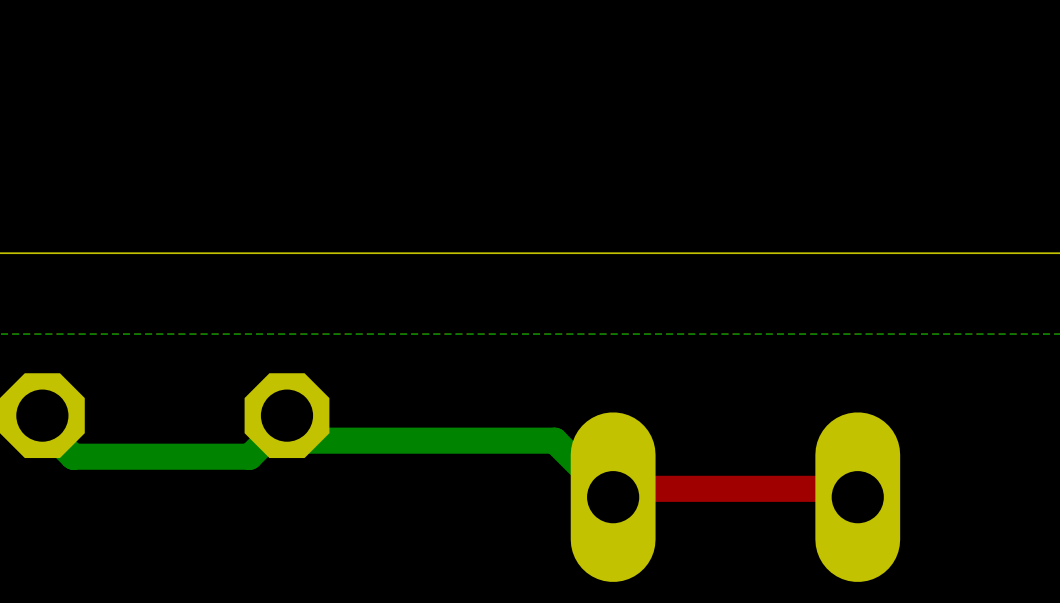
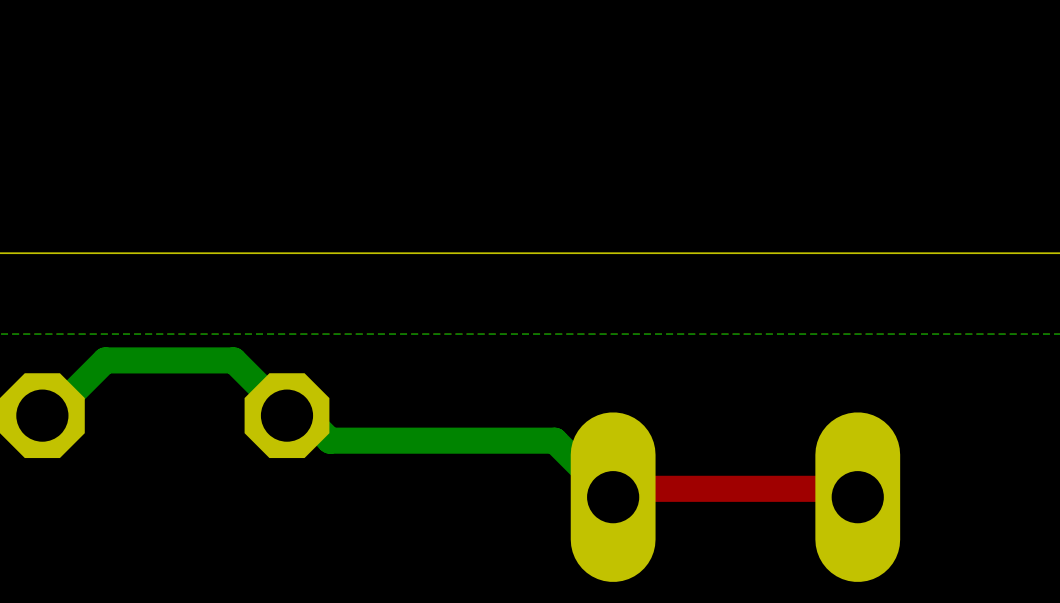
bottom track: (42, 415) (41, 424) (73, 456) (249, 456) (281, 424) (286, 415) (281, 440) (330, 440) -> (42, 415) (57, 408) (105, 360) (233, 360) (286, 415) (297, 424) (313, 424) (330, 440)

